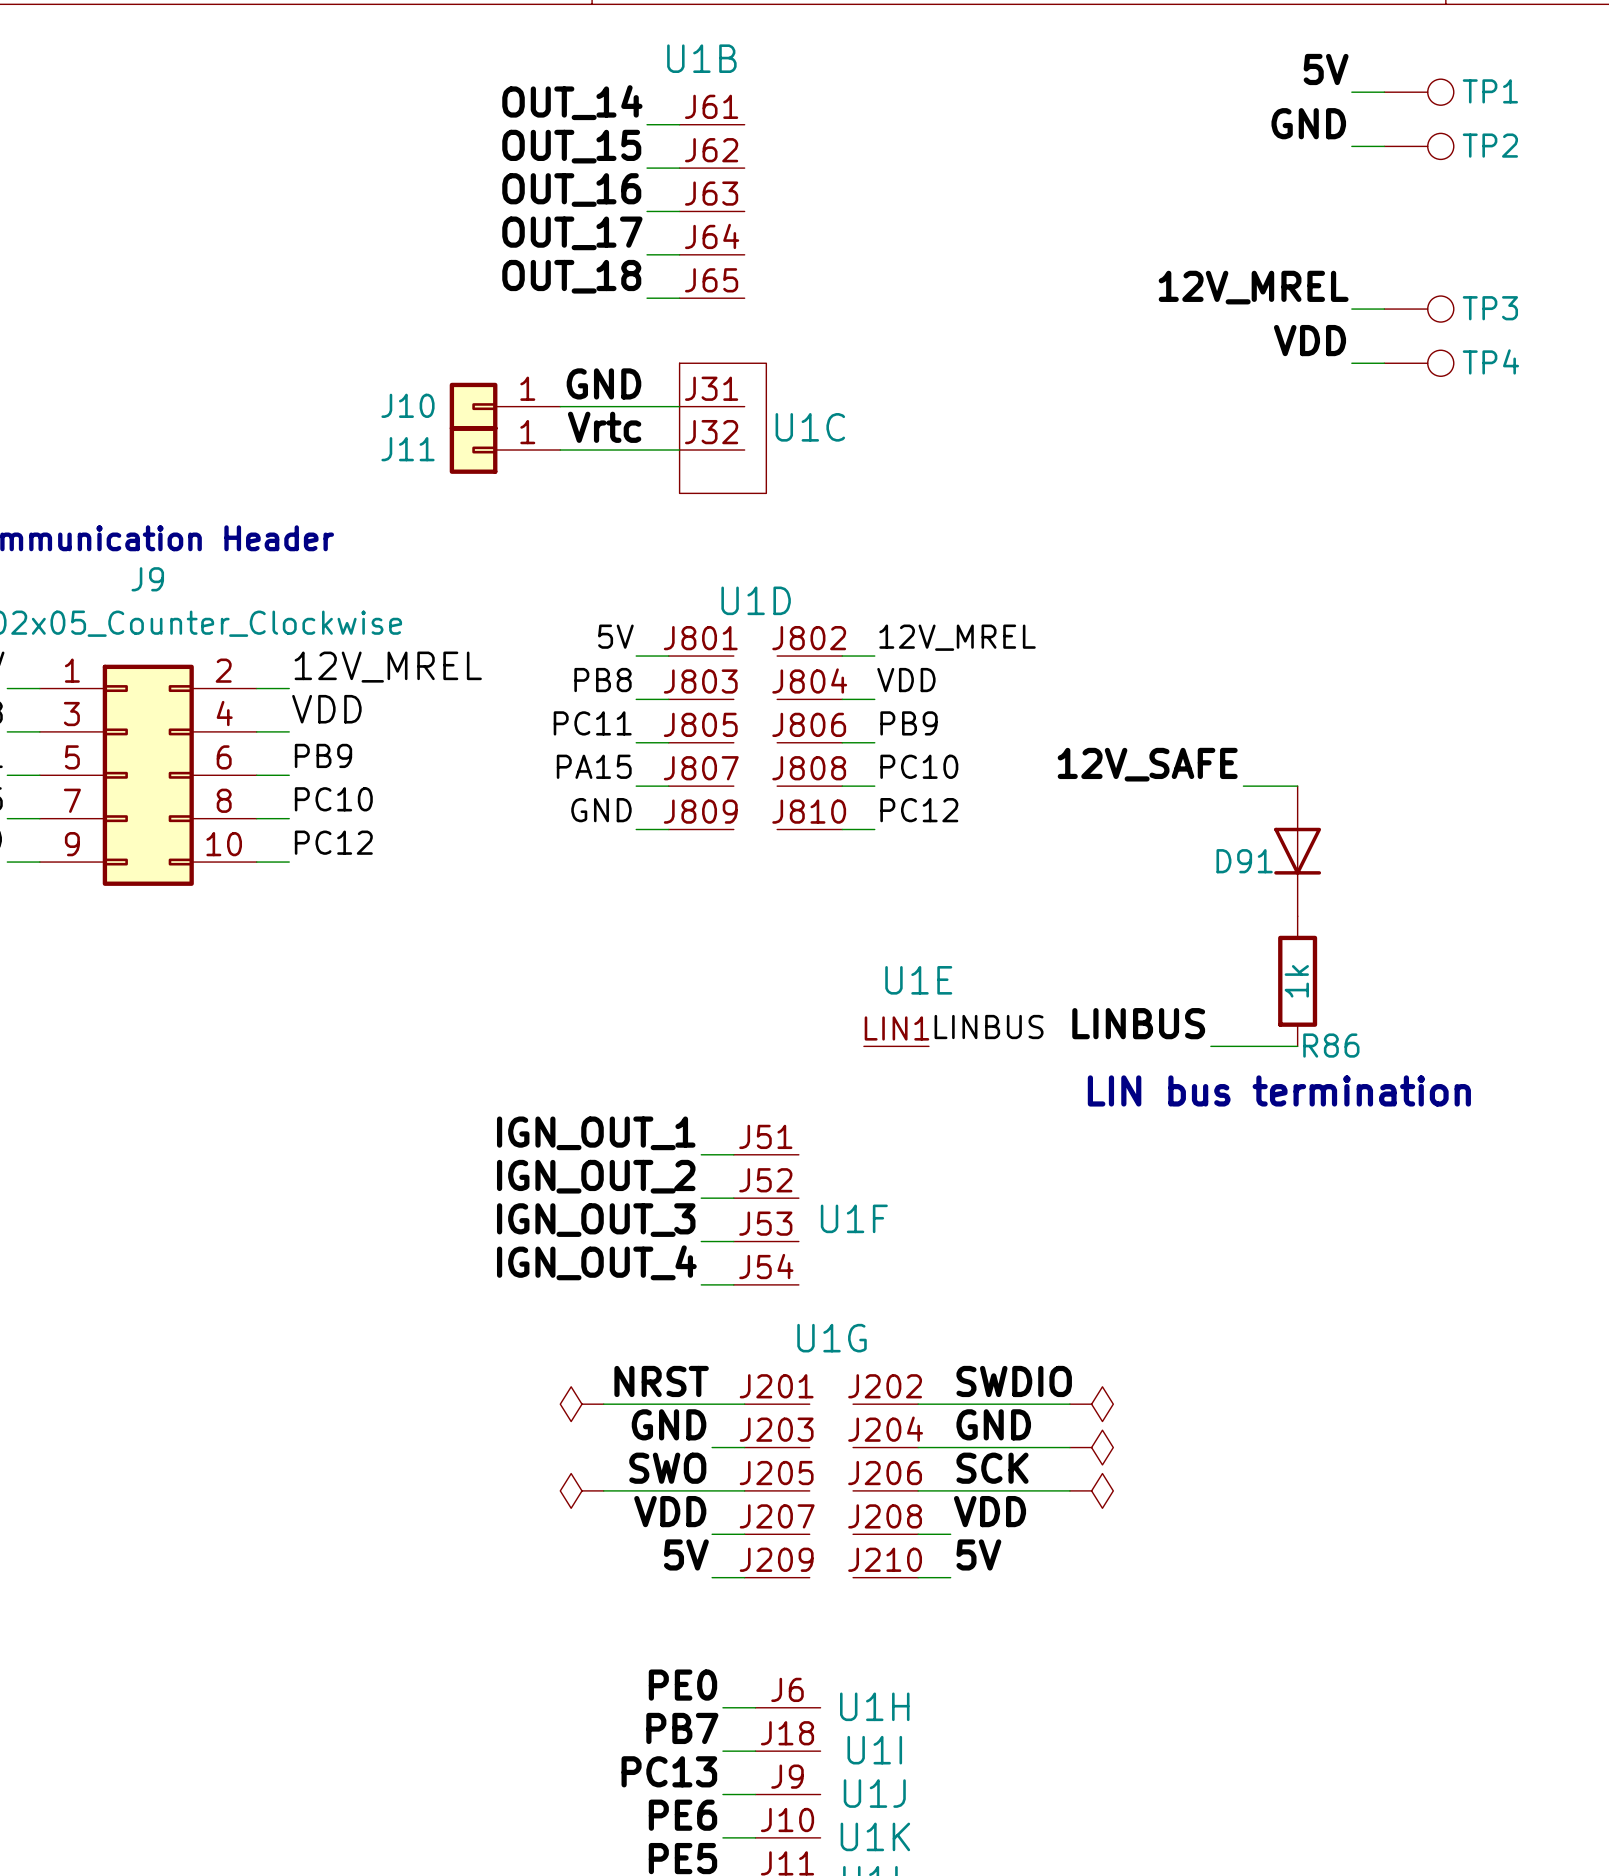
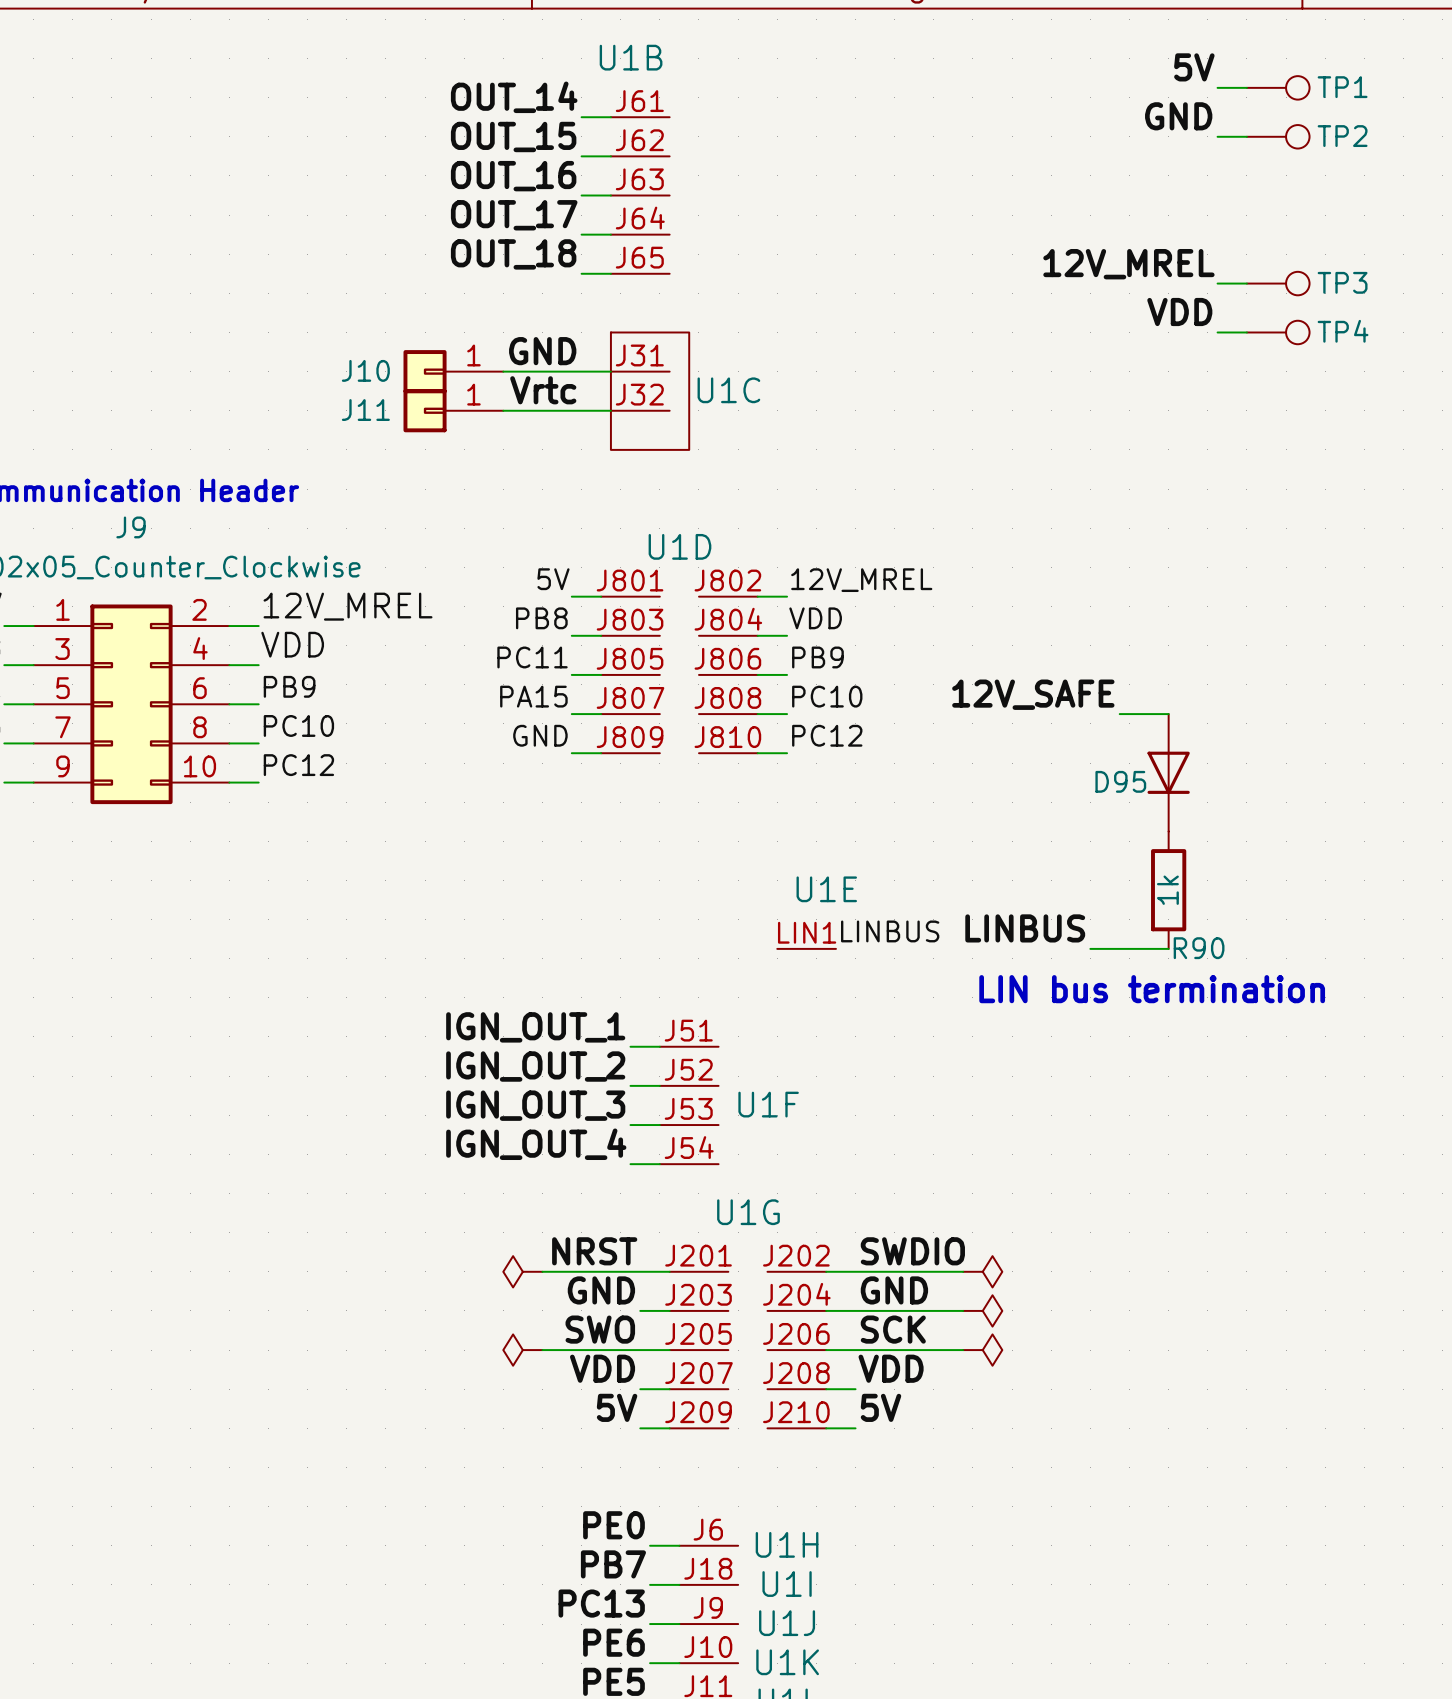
D91 name: D91 (1244, 861) -> D95 (1120, 781)
R86 name: R86 (1331, 1045) -> R90 (1199, 948)

